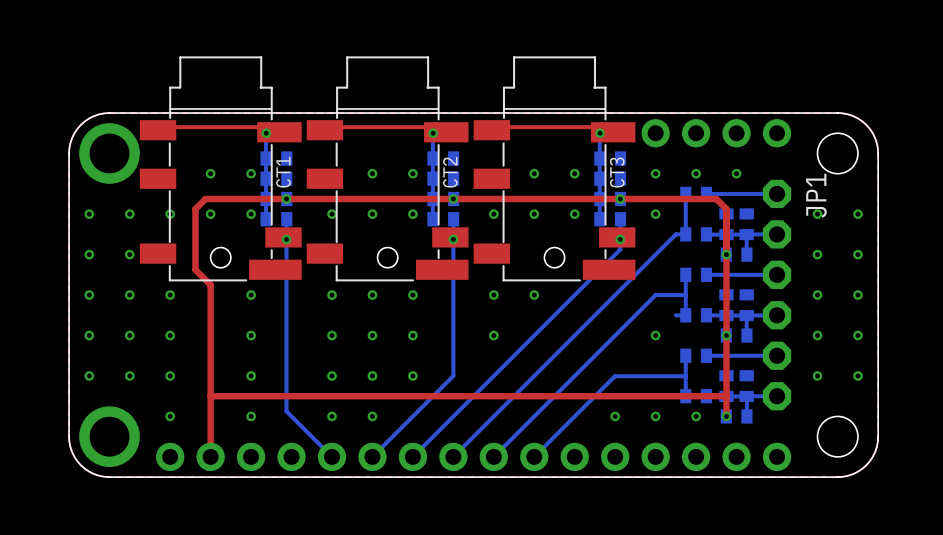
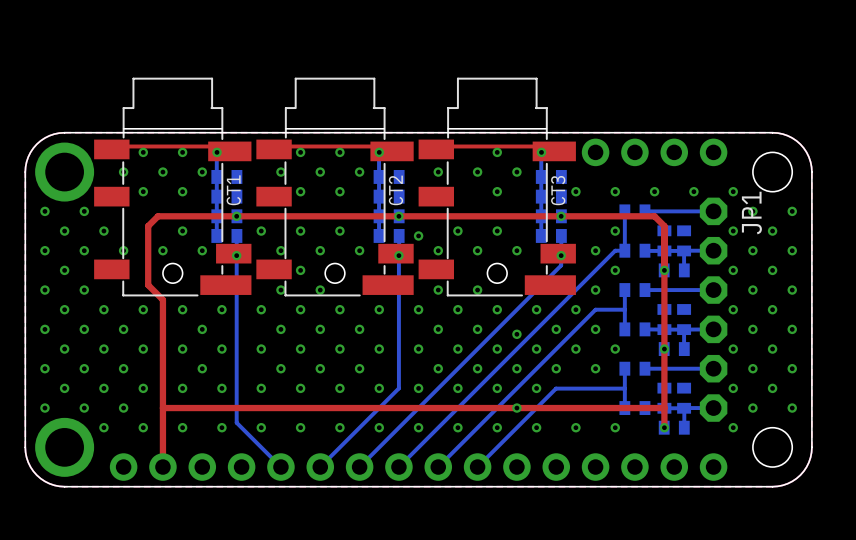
via: none -> (143, 152)
via: none -> (182, 152)
via: none -> (300, 152)
via: none -> (339, 152)
via: none -> (497, 152)
via: none -> (123, 172)
via: none -> (162, 172)
via: none -> (202, 172)
via: none -> (280, 172)
via: none -> (320, 172)
via: none -> (359, 172)
via: none -> (438, 172)
via: none -> (477, 172)
via: none -> (516, 172)
via: none -> (143, 191)
via: (210, 173) -> none
via: none -> (182, 191)
via: (251, 173) -> none
via: none -> (300, 191)
via: (372, 173) -> none
via: none -> (339, 191)
via: (412, 173) -> none
via: (534, 173) -> none
via: none -> (497, 191)
via: (574, 173) -> none
via: none -> (575, 191)
via: (655, 173) -> none
via: none -> (615, 191)
via: (696, 173) -> none
via: none -> (654, 191)
via: (736, 173) -> none
via: none -> (693, 191)
via: none -> (733, 191)
via: none -> (44, 211)
via: none -> (84, 211)
via: none -> (752, 211)
via: none -> (792, 211)
via: (89, 214) -> none
via: none -> (64, 231)
via: (129, 214) -> none
via: none -> (103, 231)
via: (170, 214) -> none
via: (210, 214) -> none
via: none -> (182, 231)
via: (251, 214) -> none
via: none -> (261, 231)
via: (332, 214) -> none
via: none -> (300, 231)
via: (372, 214) -> none
via: none -> (339, 231)
via: (412, 214) -> none
via: (493, 214) -> none
via: none -> (457, 231)
via: (534, 214) -> none
via: none -> (497, 231)
via: (574, 214) -> none
via: (655, 214) -> none
via: none -> (615, 231)
via: none -> (733, 231)
via: (817, 214) -> none
via: none -> (772, 231)
via: (857, 214) -> none
via: none -> (418, 235)
via: none -> (44, 250)
via: none -> (84, 250)
via: none -> (123, 250)
via: none -> (162, 250)
via: none -> (202, 250)
via: none -> (280, 250)
via: none -> (320, 250)
via: none -> (359, 250)
via: none -> (438, 250)
via: none -> (477, 250)
via: none -> (516, 250)
via: none -> (595, 250)
via: none -> (752, 250)
via: none -> (792, 250)
via: (89, 254) -> none
via: none -> (64, 270)
via: (129, 254) -> none
via: none -> (300, 270)
via: none -> (615, 270)
via: none -> (733, 270)
via: (817, 254) -> none
via: none -> (772, 270)
via: (857, 254) -> none
via: none -> (44, 290)
via: none -> (84, 290)
via: none -> (280, 290)
via: none -> (320, 290)
via: none -> (438, 290)
via: none -> (477, 290)
via: none -> (595, 290)
via: none -> (752, 290)
via: none -> (792, 290)
via: (89, 295) -> none
via: none -> (64, 309)
via: (129, 295) -> none
via: none -> (103, 309)
via: (170, 295) -> none
via: none -> (143, 309)
via: none -> (182, 309)
via: (251, 295) -> none
via: none -> (221, 309)
via: none -> (261, 309)
via: (332, 295) -> none
via: none -> (300, 309)
via: (372, 295) -> none
via: none -> (339, 309)
via: (412, 295) -> none
via: none -> (379, 309)
via: none -> (418, 309)
via: (493, 295) -> none
via: none -> (457, 309)
via: (534, 295) -> none
via: none -> (497, 309)
via: none -> (536, 309)
via: none -> (575, 309)
via: none -> (733, 309)
via: (817, 295) -> none
via: none -> (772, 309)
via: (857, 295) -> none
via: none -> (44, 329)
via: none -> (84, 329)
via: none -> (123, 329)
via: none -> (202, 329)
via: none -> (280, 329)
via: none -> (320, 329)
via: none -> (359, 329)
via: none -> (438, 329)
via: none -> (477, 329)
via: none -> (556, 329)
via: none -> (595, 329)
bottom track: (675, 315) (685, 315) -> none
via: none -> (752, 329)
via: none -> (792, 329)
via: none -> (516, 334)
via: (89, 335) -> none
via: none -> (64, 349)
via: (129, 335) -> none
via: none -> (103, 349)
via: (170, 335) -> none
via: none -> (143, 349)
via: none -> (182, 349)
via: (251, 335) -> none
via: none -> (221, 349)
via: none -> (261, 349)
via: (332, 335) -> none
via: none -> (300, 349)
via: (372, 335) -> none
via: none -> (339, 349)
via: (412, 335) -> none
via: none -> (379, 349)
via: none -> (418, 349)
via: (493, 335) -> none
via: none -> (457, 349)
via: none -> (497, 349)
via: none -> (536, 349)
via: none -> (575, 349)
via: (655, 335) -> none
via: none -> (615, 349)
via: none -> (733, 349)
via: (817, 335) -> none
via: none -> (772, 349)
via: (857, 335) -> none
via: none -> (44, 368)
via: none -> (84, 368)
via: none -> (123, 368)
via: none -> (202, 368)
via: none -> (280, 368)
via: none -> (320, 368)
via: none -> (359, 368)
via: none -> (438, 368)
via: none -> (477, 368)
via: none -> (516, 368)
via: none -> (556, 368)
via: none -> (595, 368)
via: none -> (752, 368)
via: none -> (792, 368)
via: (89, 375) -> none
via: none -> (64, 388)
via: (129, 375) -> none
via: none -> (103, 388)
via: (170, 375) -> none
via: none -> (143, 388)
via: none -> (182, 388)
via: (251, 375) -> none
via: none -> (221, 388)
via: none -> (261, 388)
via: (332, 375) -> none
via: none -> (300, 388)
via: (372, 375) -> none
via: none -> (339, 388)
via: (412, 375) -> none
via: none -> (379, 388)
via: none -> (418, 388)
via: none -> (457, 388)
via: none -> (497, 388)
via: none -> (536, 388)
via: none -> (733, 388)
via: (817, 375) -> none
via: none -> (772, 388)
via: (857, 375) -> none
via: none -> (44, 408)
via: none -> (84, 408)
via: none -> (123, 408)
via: none -> (516, 408)
via: none -> (752, 408)
via: none -> (792, 408)
via: none -> (103, 427)
via: (170, 416) -> none
via: none -> (143, 427)
via: none -> (182, 427)
via: (251, 416) -> none
via: none -> (221, 427)
via: none -> (261, 427)
via: (332, 416) -> none
via: none -> (300, 427)
via: (372, 416) -> none
via: none -> (339, 427)
via: none -> (379, 427)
via: none -> (418, 427)
via: none -> (457, 427)
via: none -> (497, 427)
via: none -> (536, 427)
via: (615, 416) -> none
via: none -> (575, 427)
via: (655, 416) -> none
via: none -> (615, 427)
via: (696, 416) -> none
via: none -> (733, 427)

